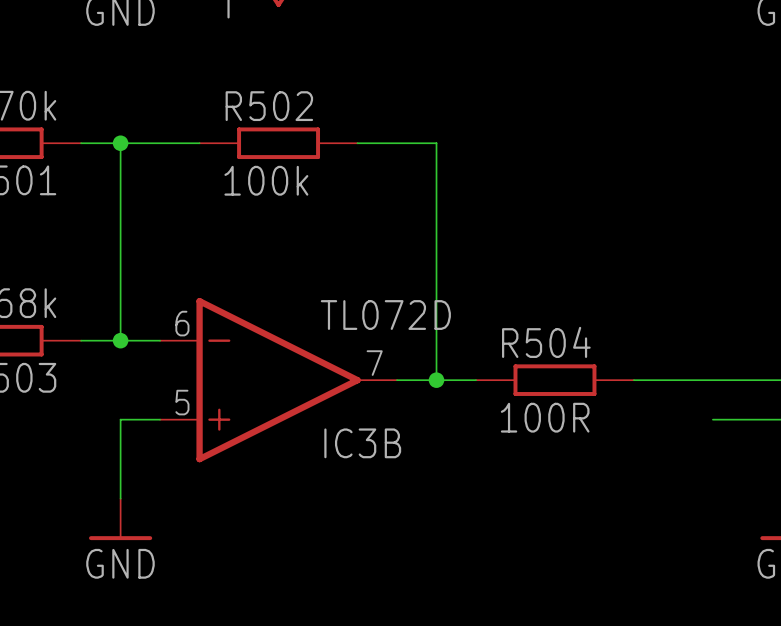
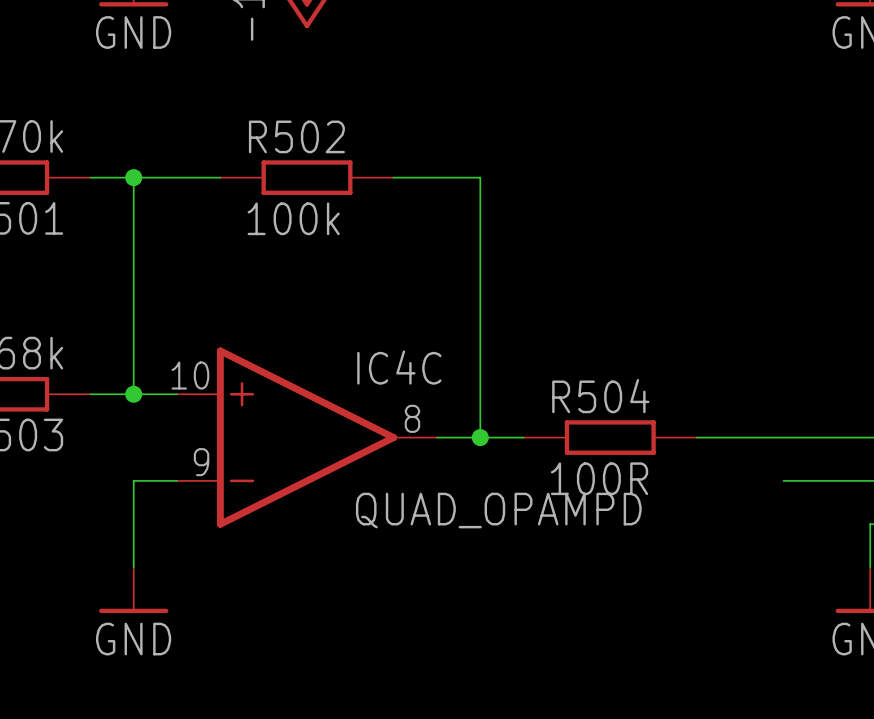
IC3B: TL072D (278, 380) -> none
IC4C: none -> QUAD_OPAMPD (307, 437)

